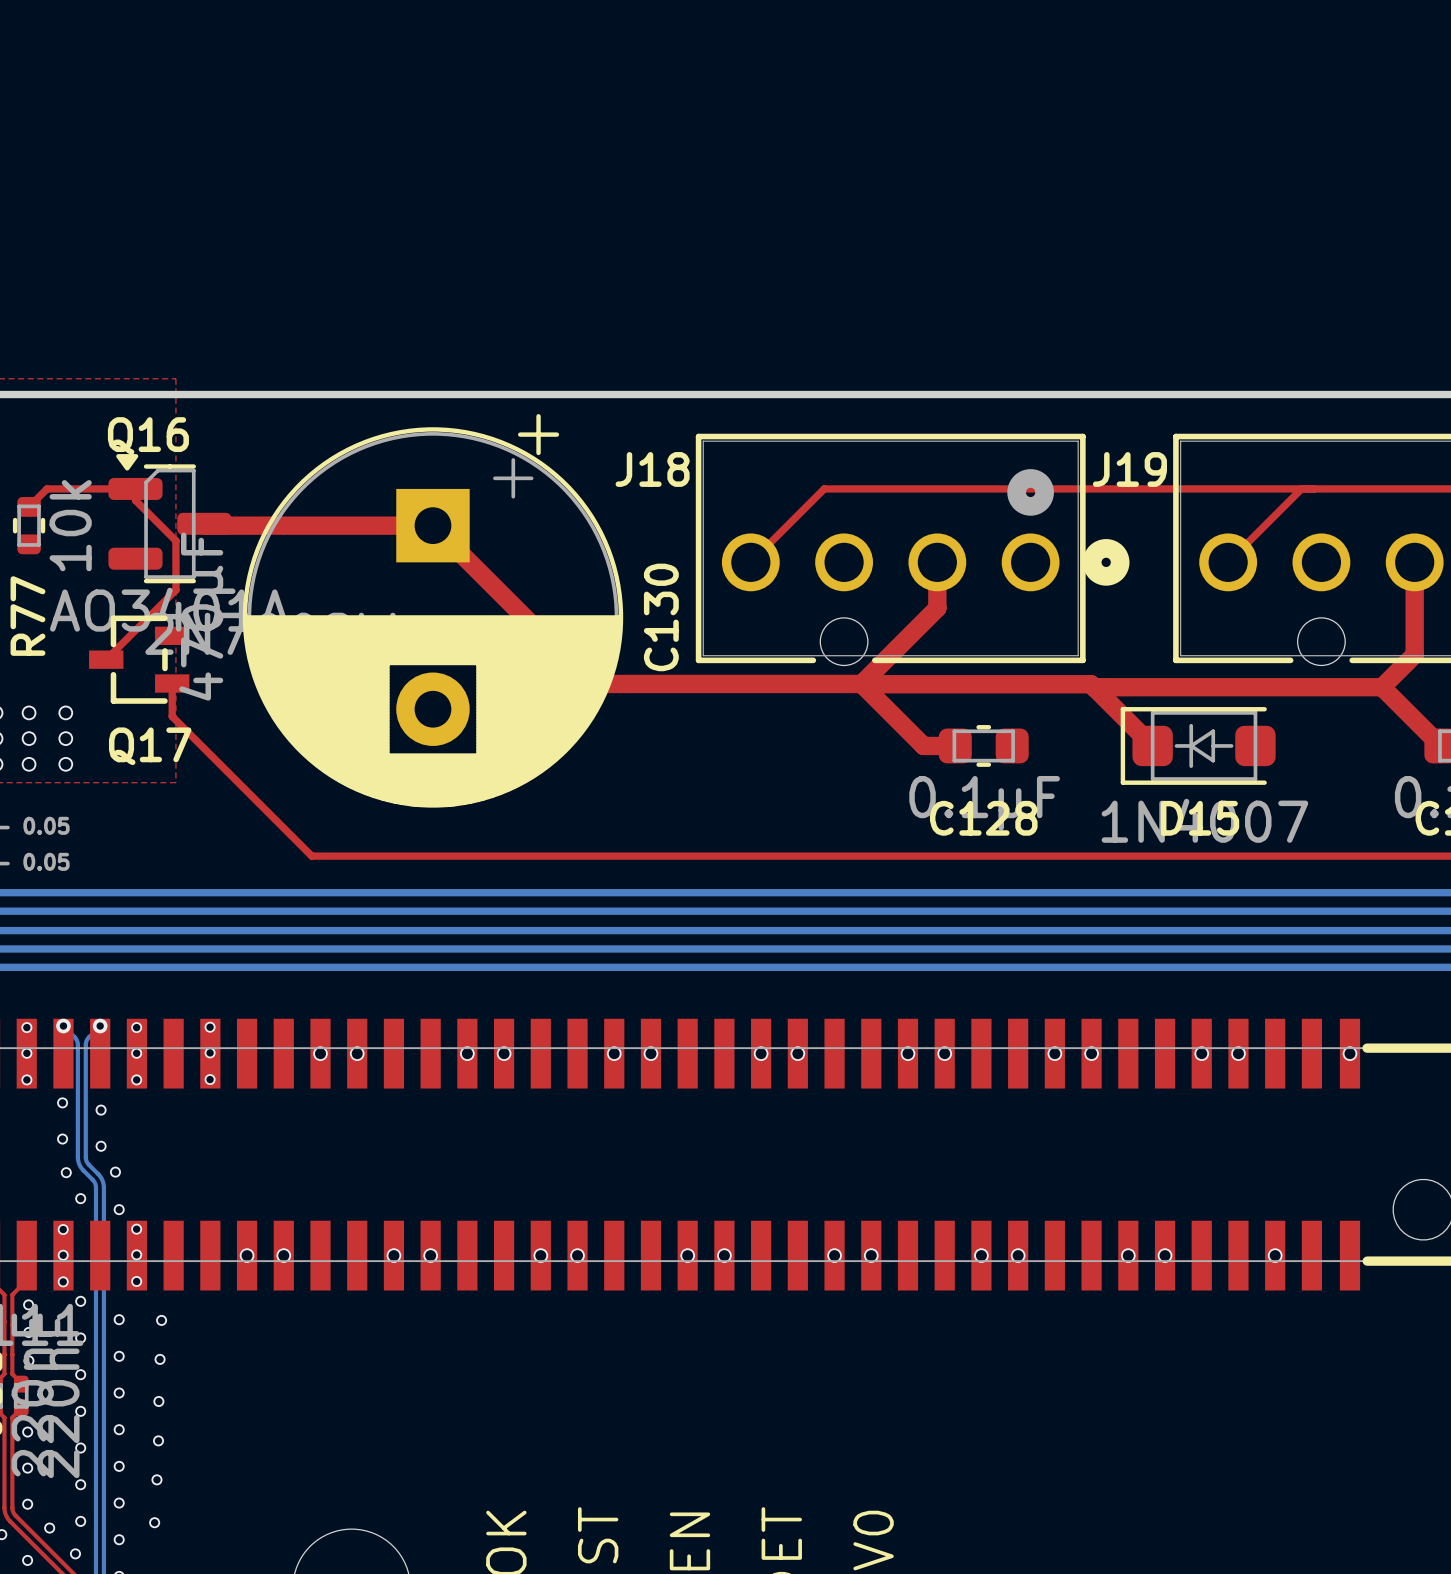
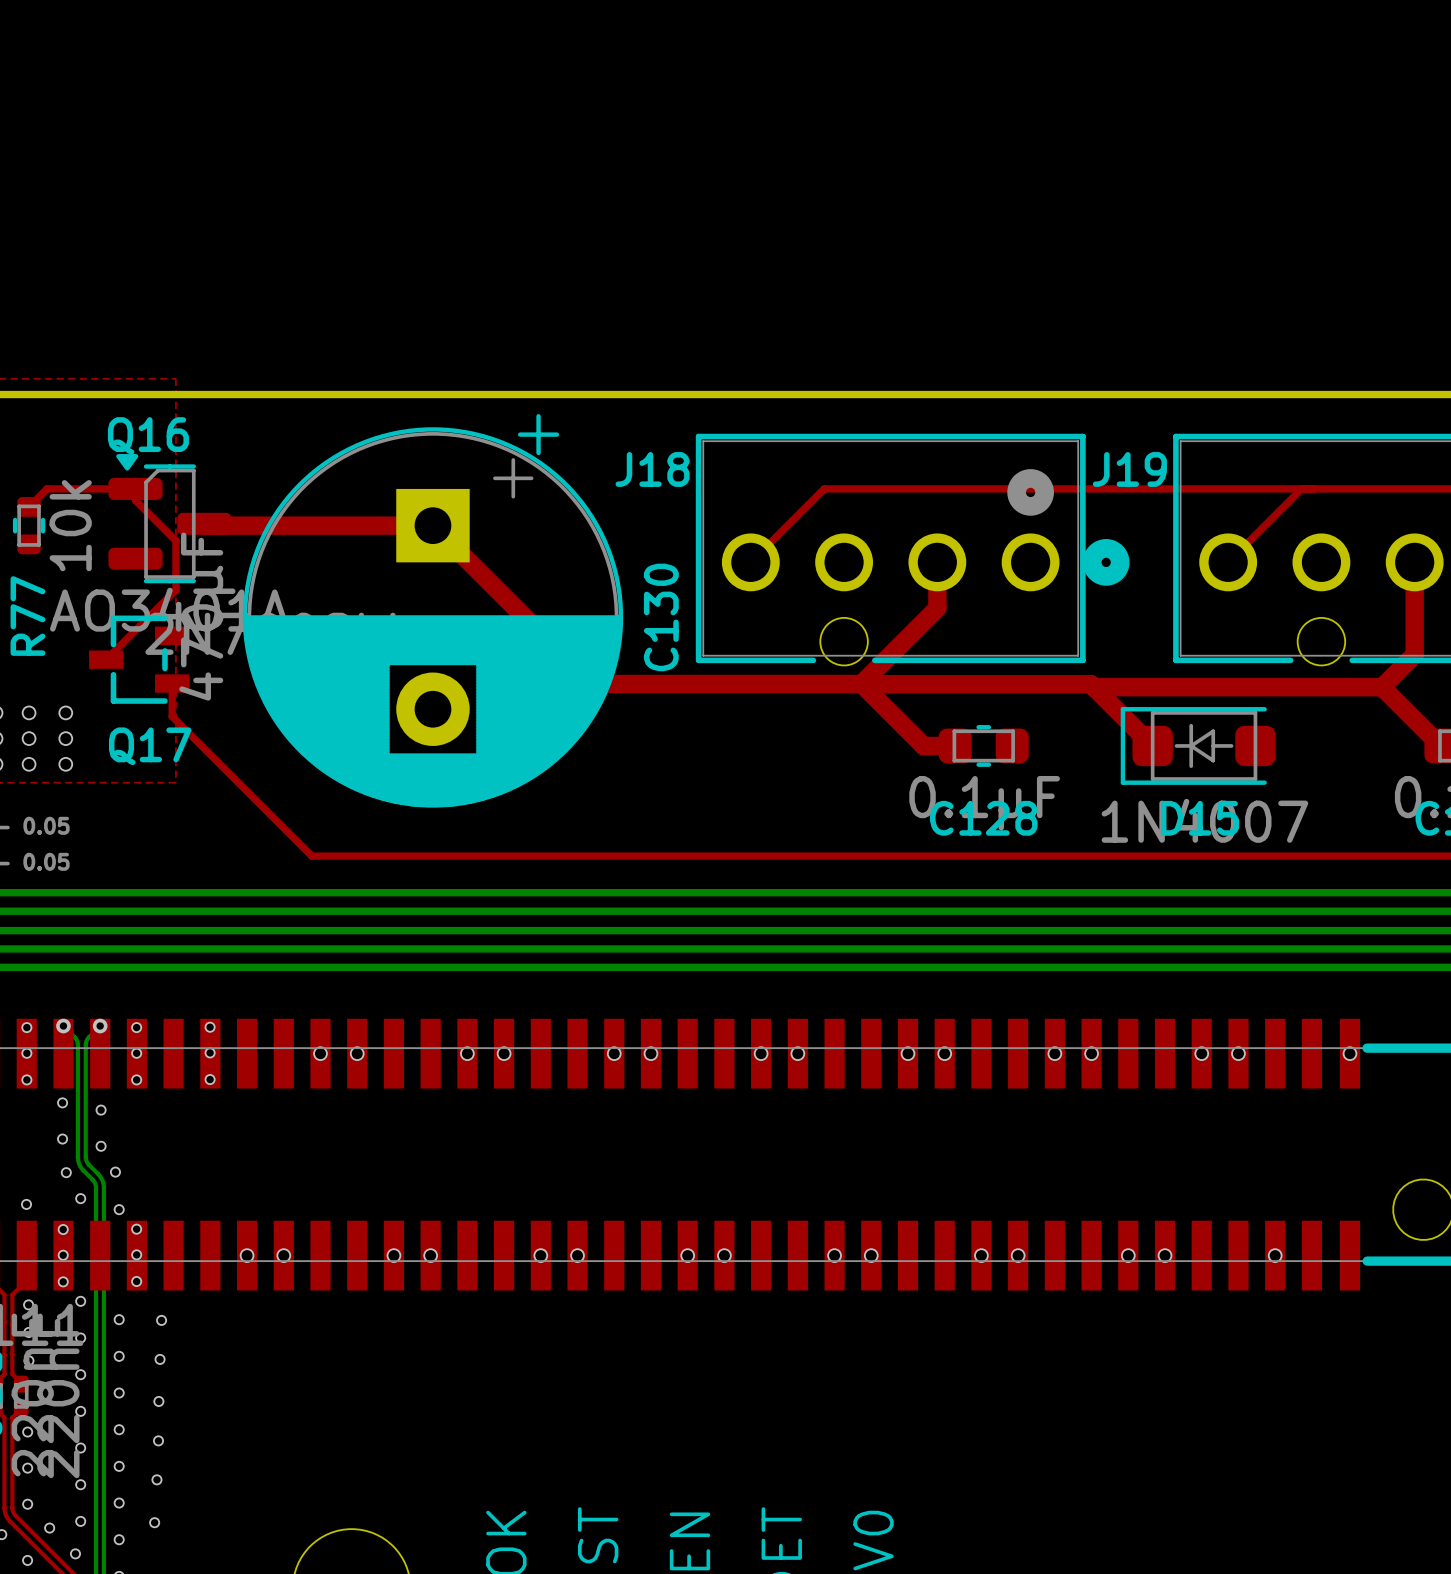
via: none -> (26, 1204)

